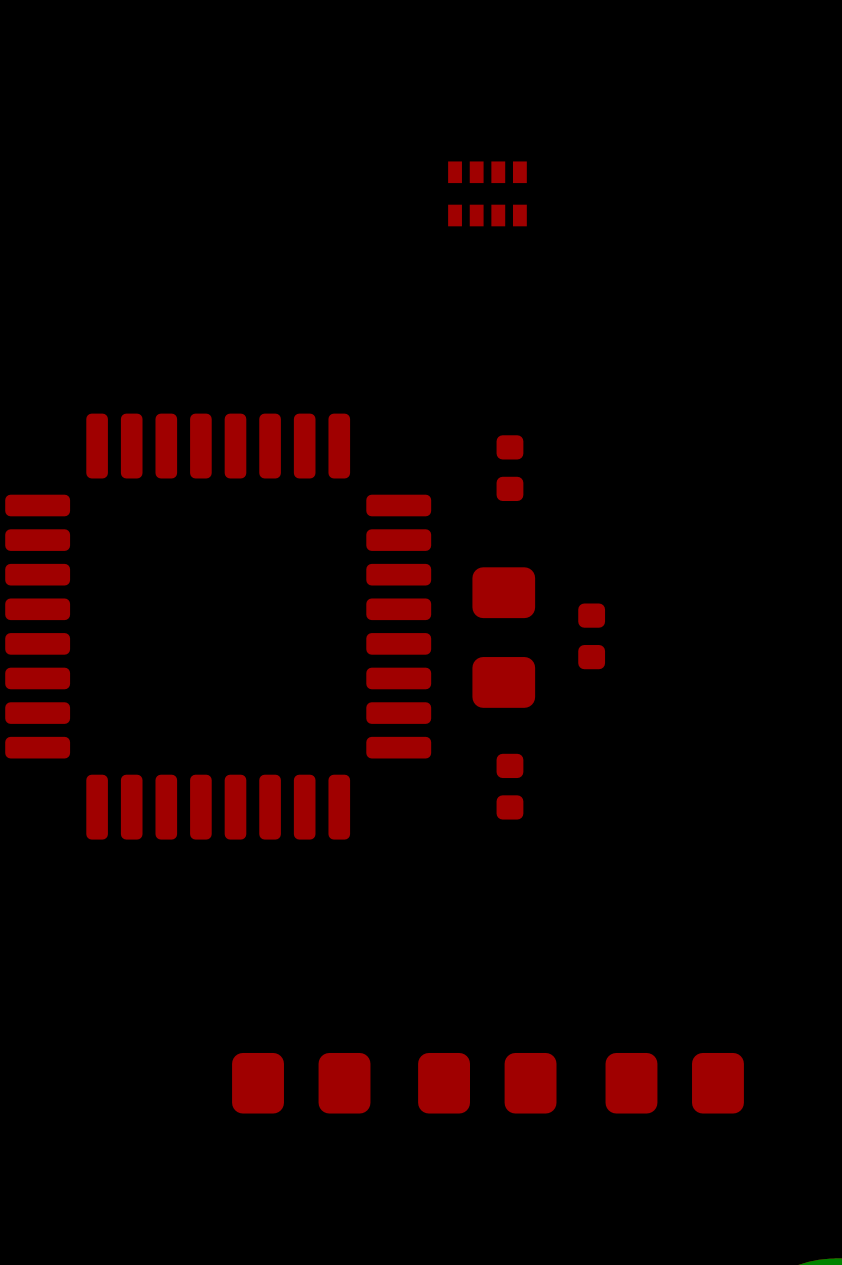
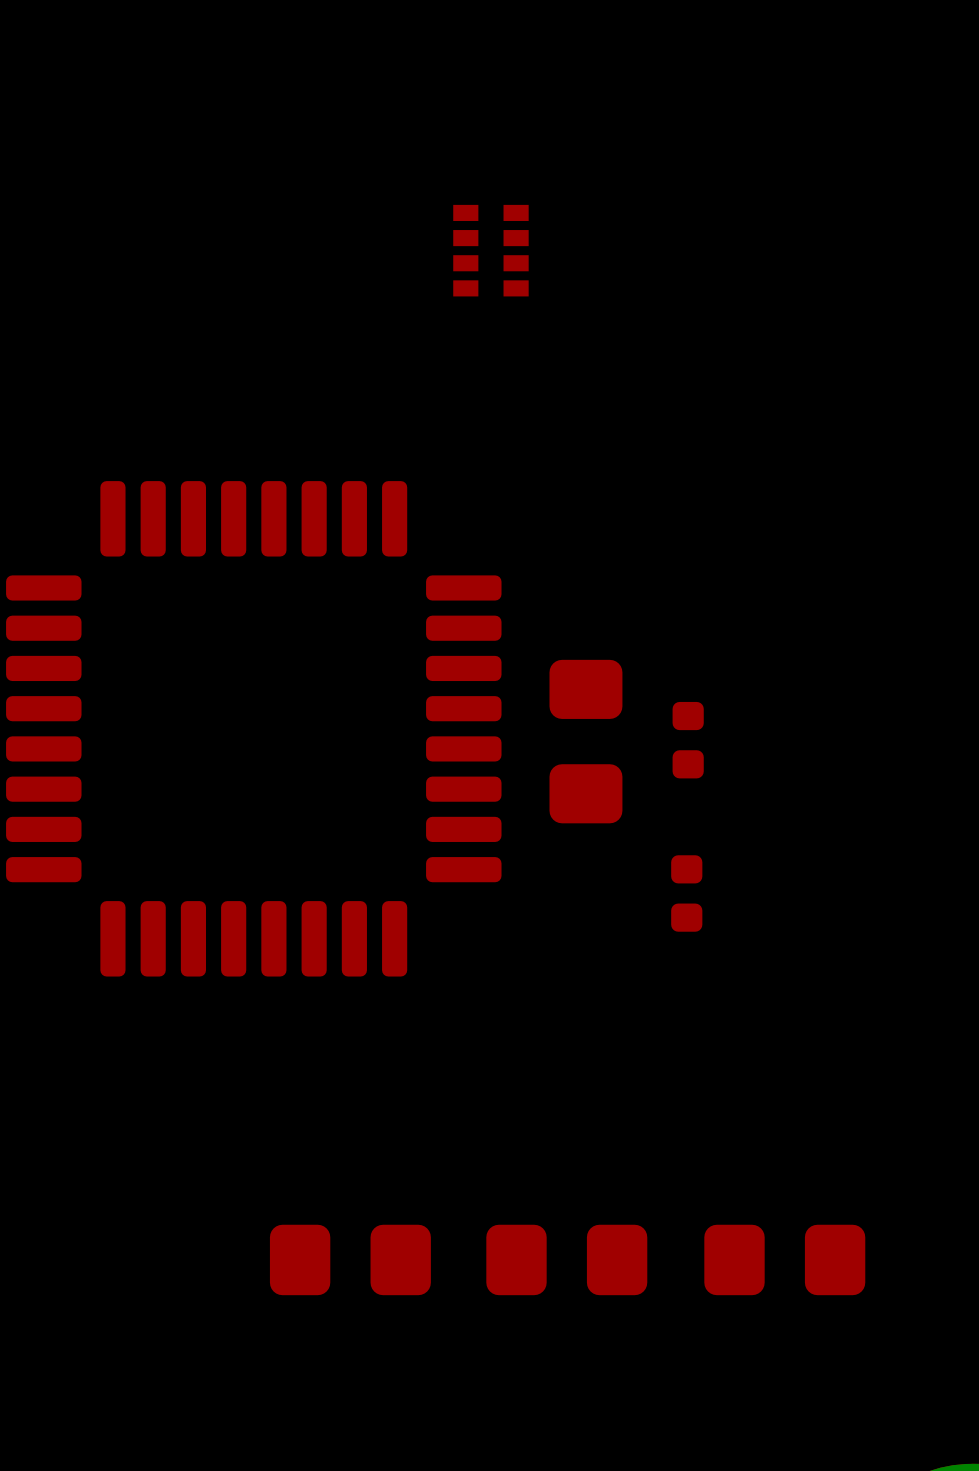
part rotation: 0° (487, 193) -> 90° clockwise (490, 250)
part position: (487, 193) -> (490, 250)
part: (509, 468) -> none
part position: (509, 786) -> (686, 893)

